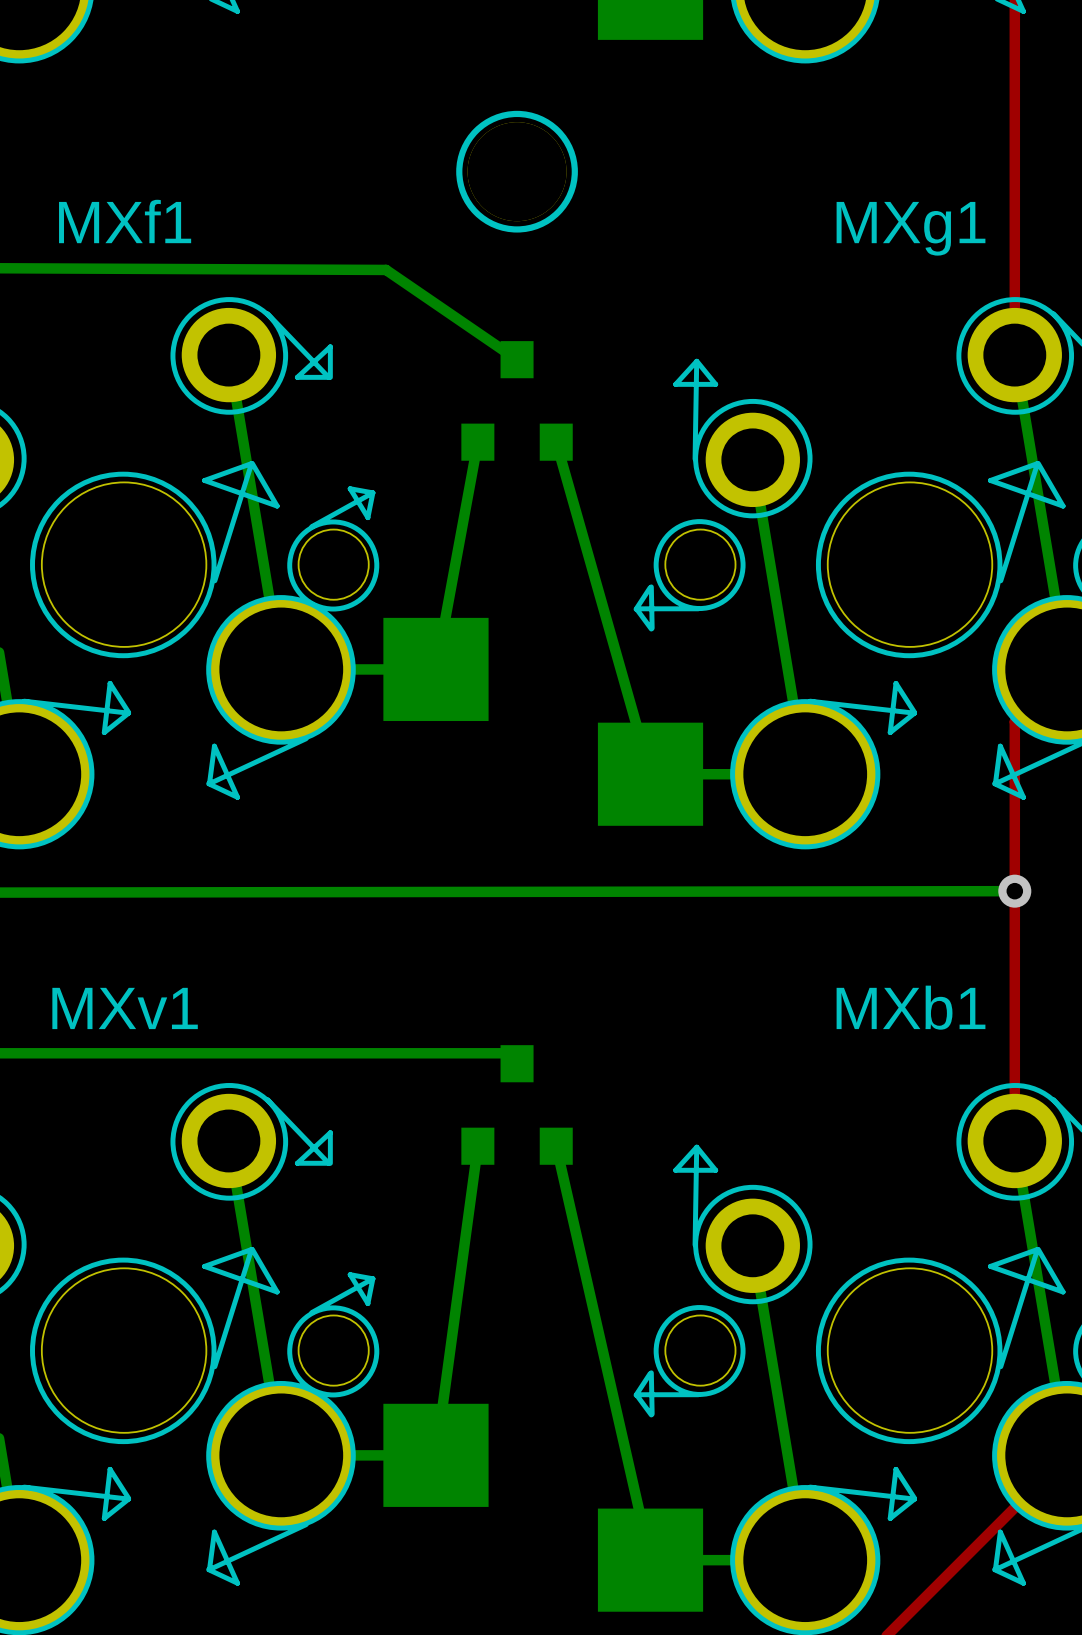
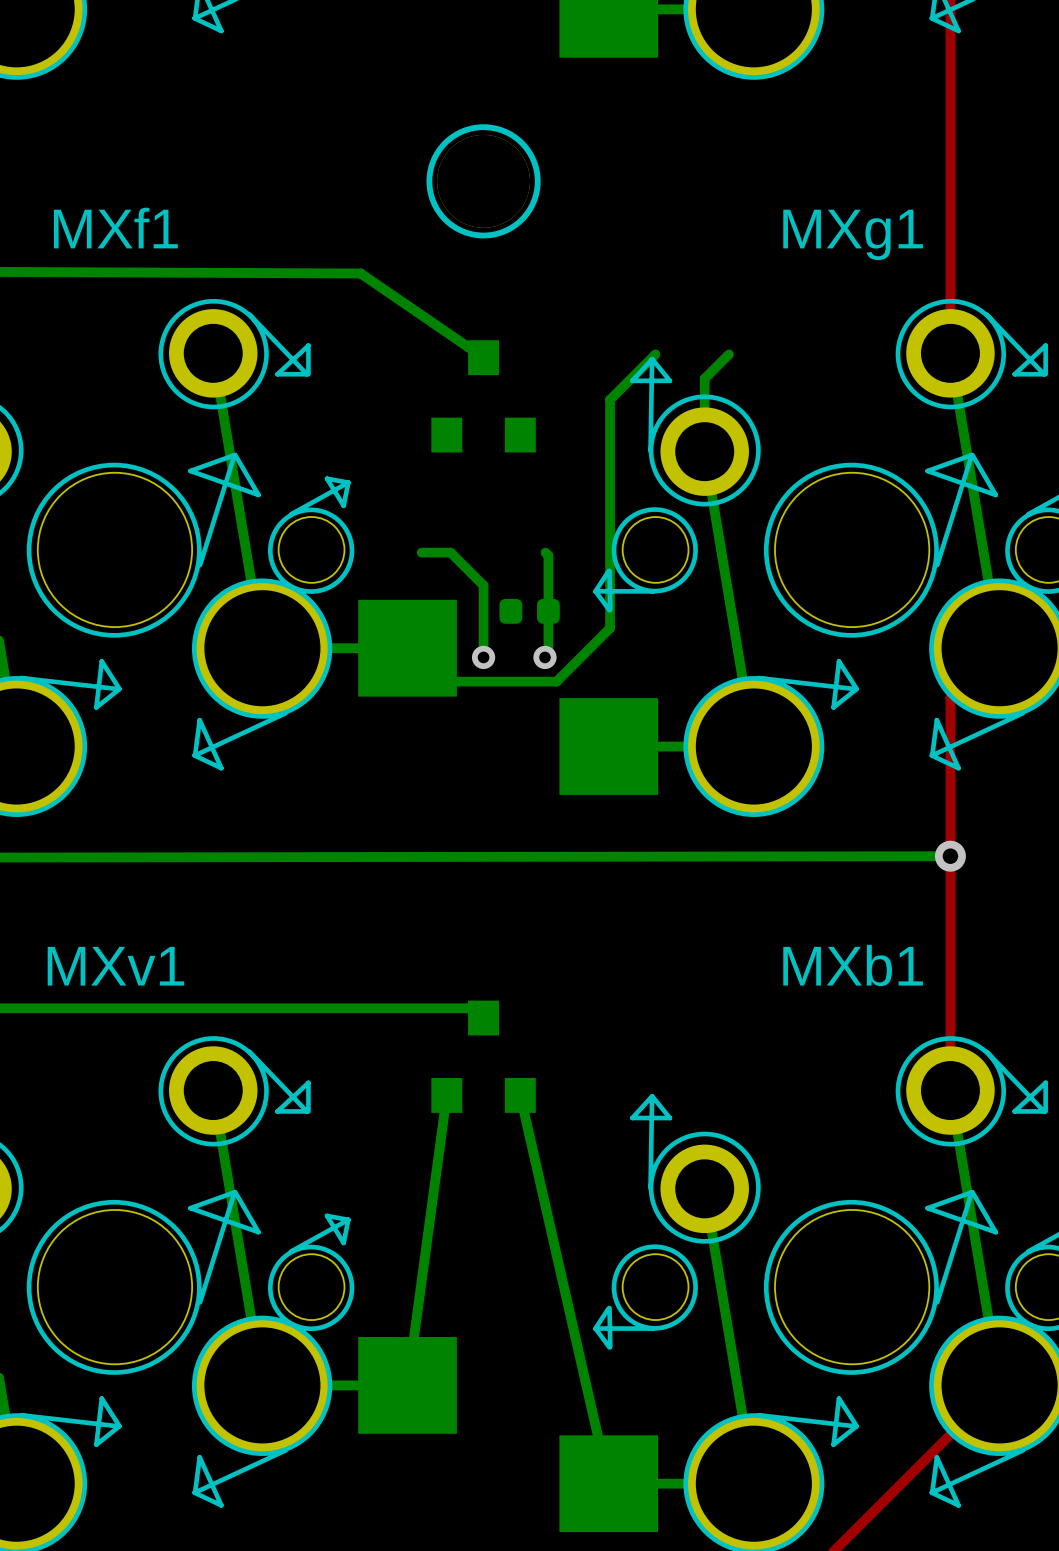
bottom track: none -> (729, 354) (704, 378) (704, 451)
bottom track: (477, 442) (435, 669) -> (655, 354) (610, 399) (610, 628) (556, 681) (440, 681) (407, 648)
bottom track: (556, 442) (650, 774) -> none
bottom track: none -> (421, 552) (450, 552) (483, 585) (483, 657)
bottom track: none -> (545, 552) (548, 555) (548, 654) (544, 657)
part: none -> (529, 611)
via: none -> (483, 657)
via: none -> (544, 657)

